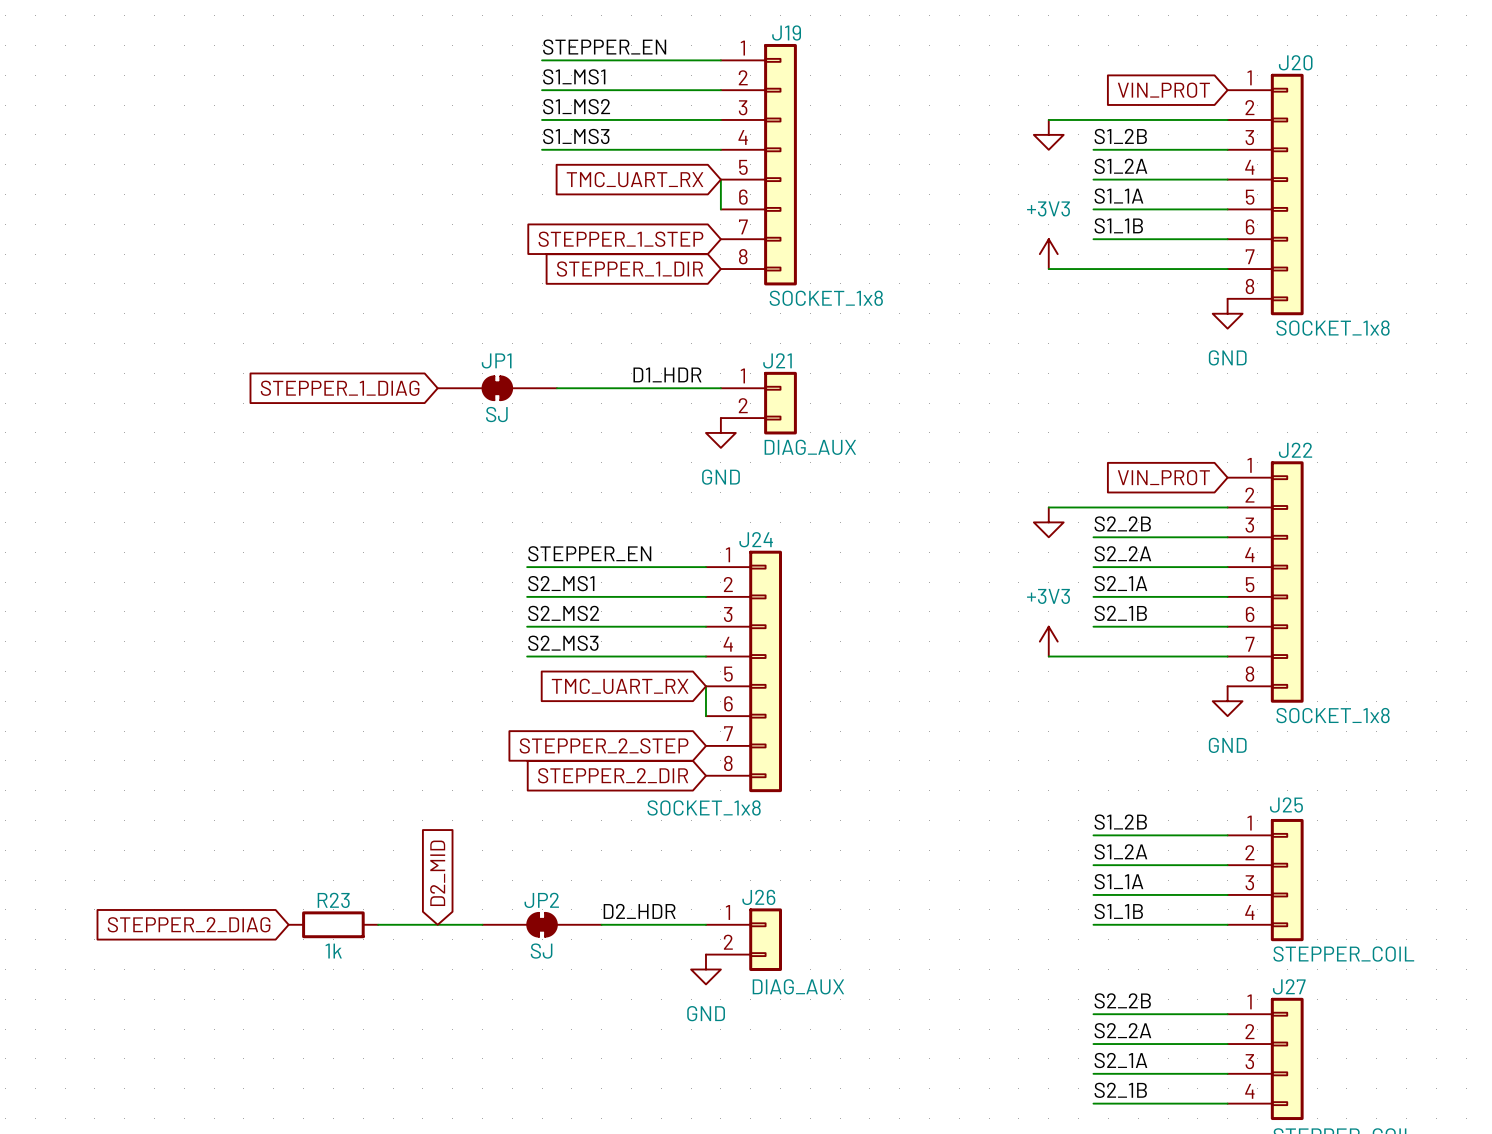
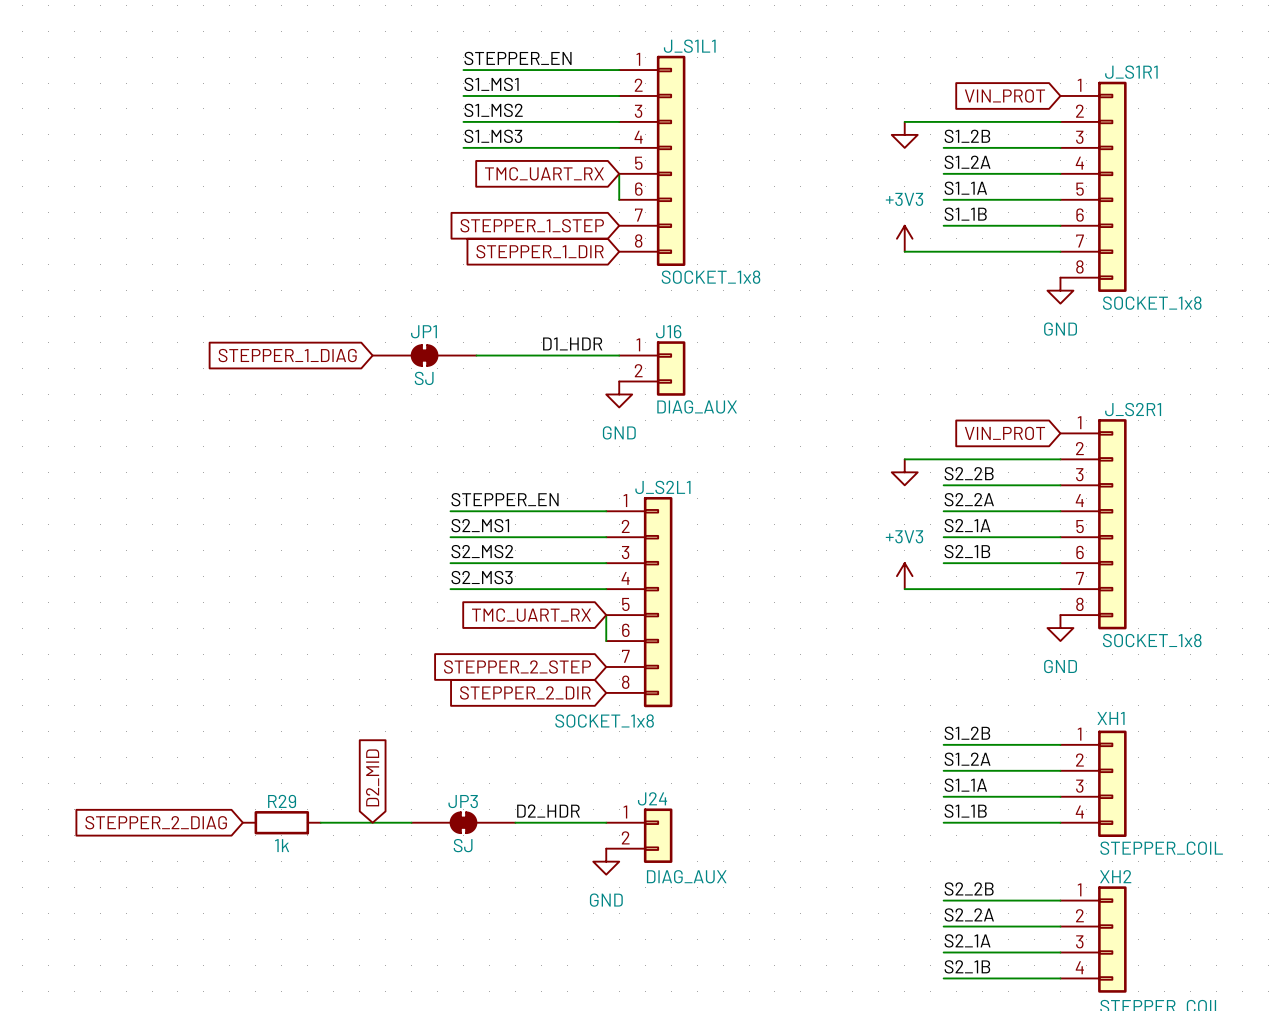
J19 name: J19 (786, 33) -> J_S1L1 (689, 46)
J20 name: J20 (1295, 62) -> J_S1R1 (1131, 72)
J21 name: J21 (777, 360) -> J16 (668, 331)
J22 name: J22 (1295, 450) -> J_S2R1 (1133, 409)
J24 name: J24 (756, 539) -> J_S2L1 (662, 487)
J25 name: J25 (1286, 805) -> XH1 (1111, 718)
J26 name: J26 (758, 897) -> J24 (652, 798)
R23 name: R23 (333, 900) -> R29 (282, 801)
JP2 name: JP2 (541, 900) -> JP3 (463, 801)
J27 name: J27 (1289, 986) -> XH2 (1115, 876)

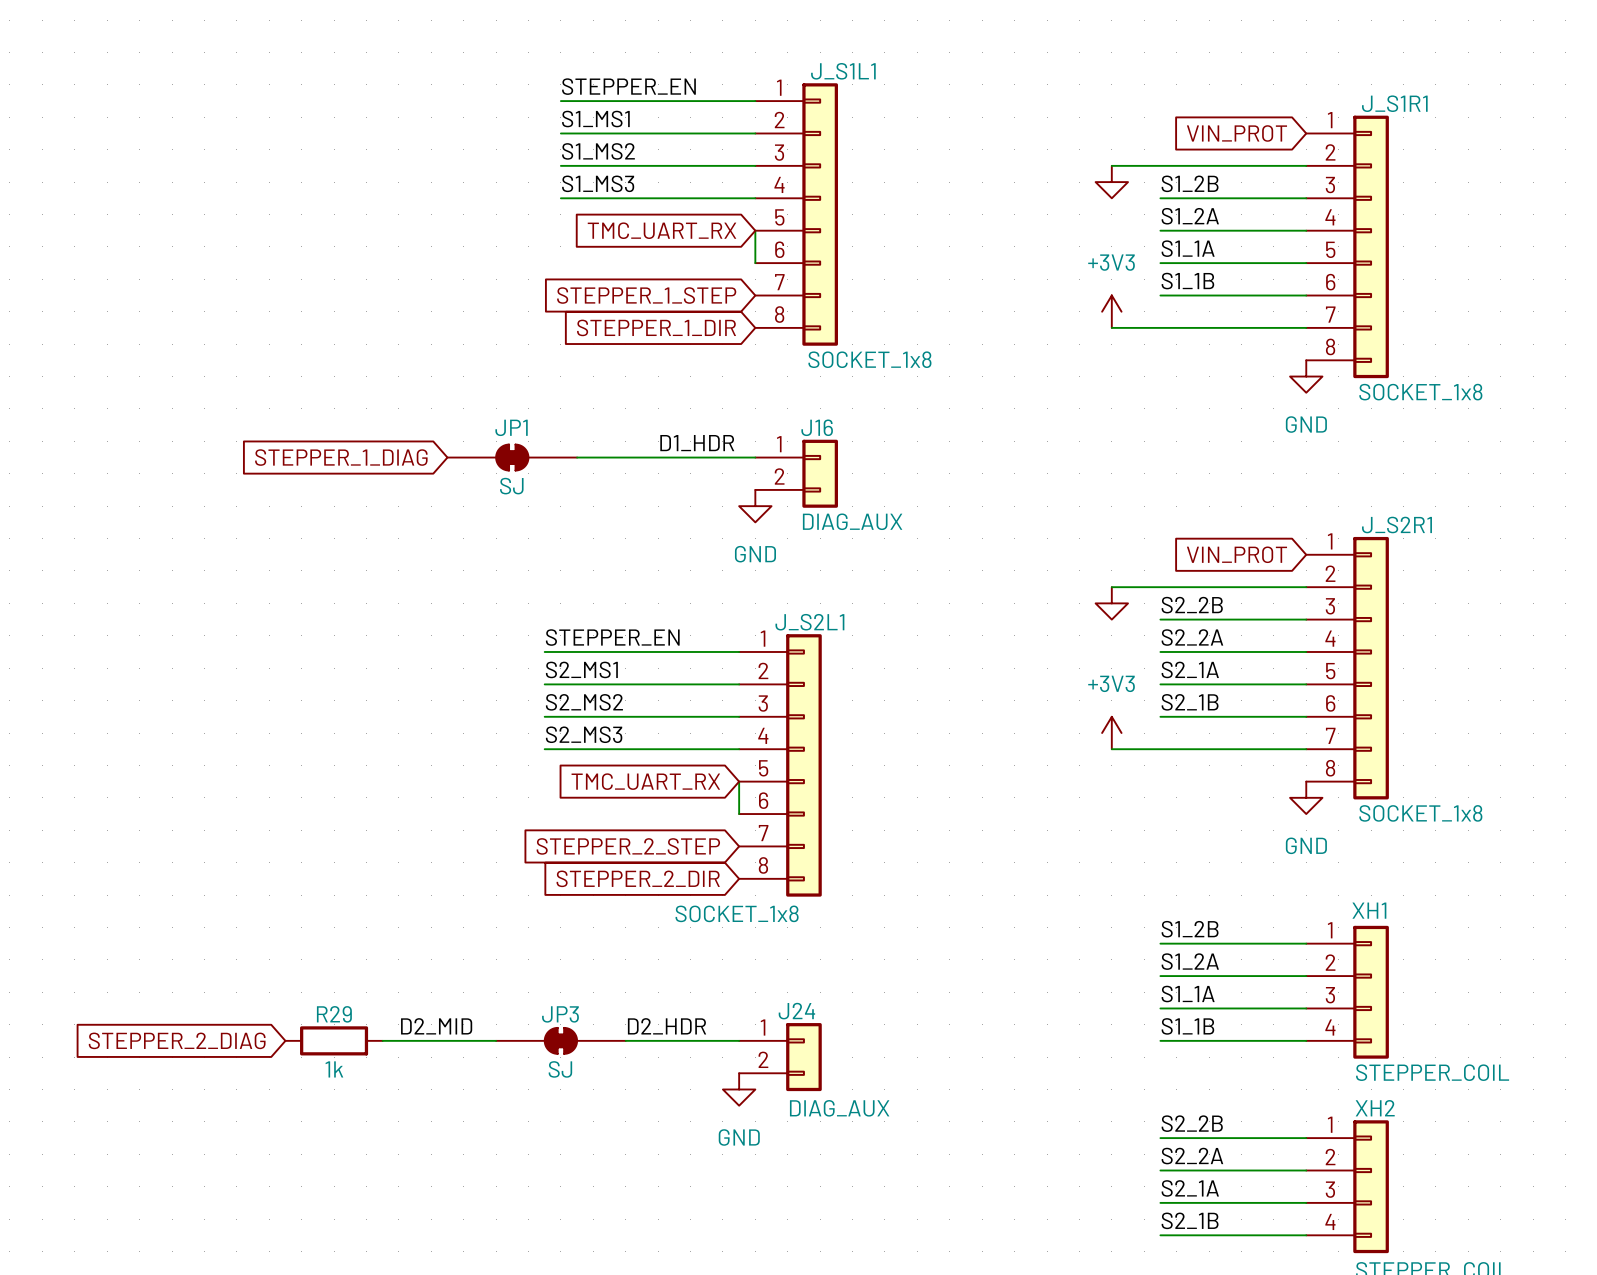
global label: D2_MID (372, 777) -> none
label: none -> D2_MID (436, 1026)

